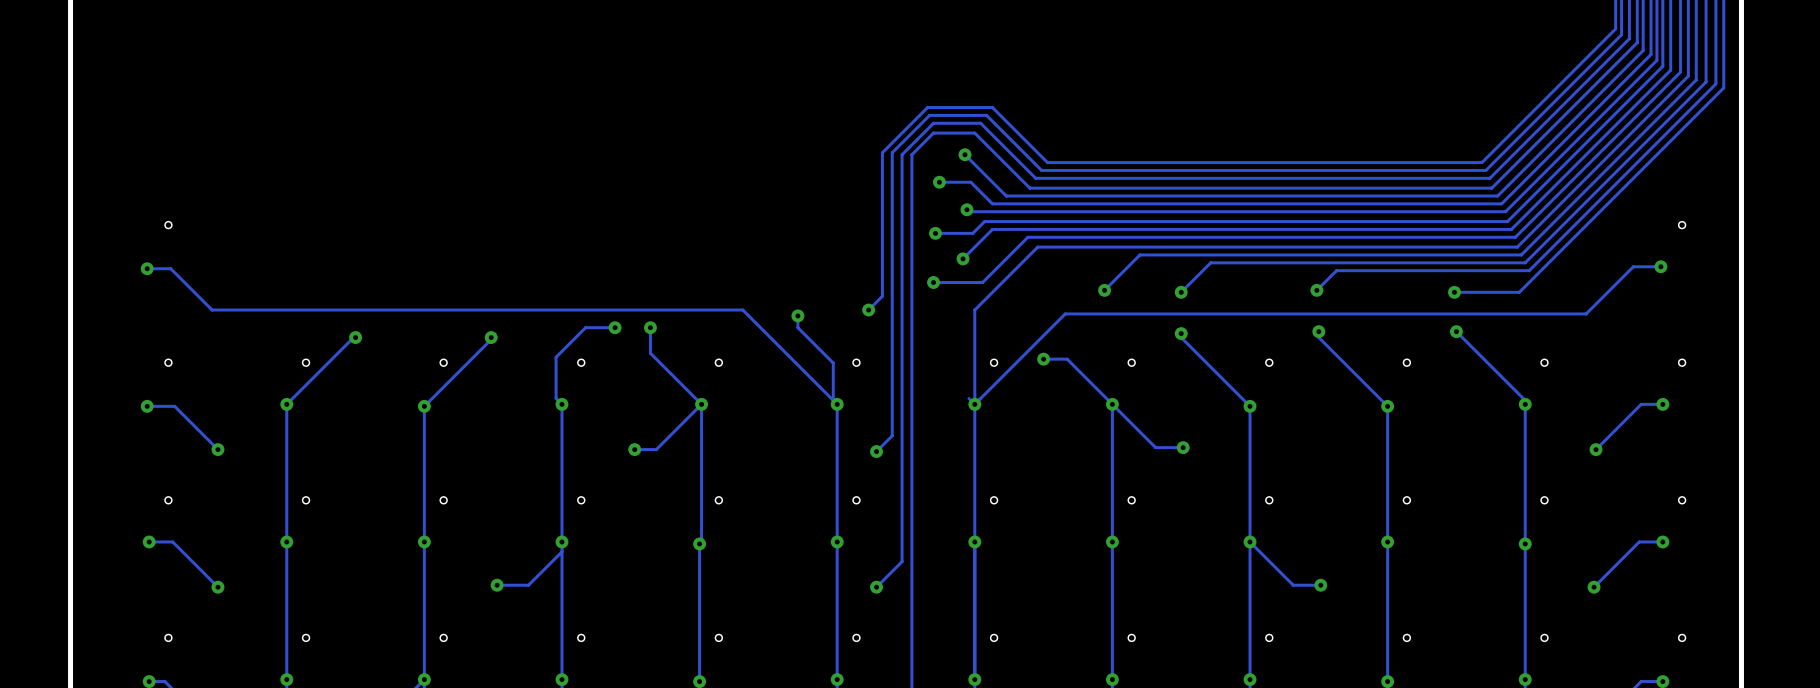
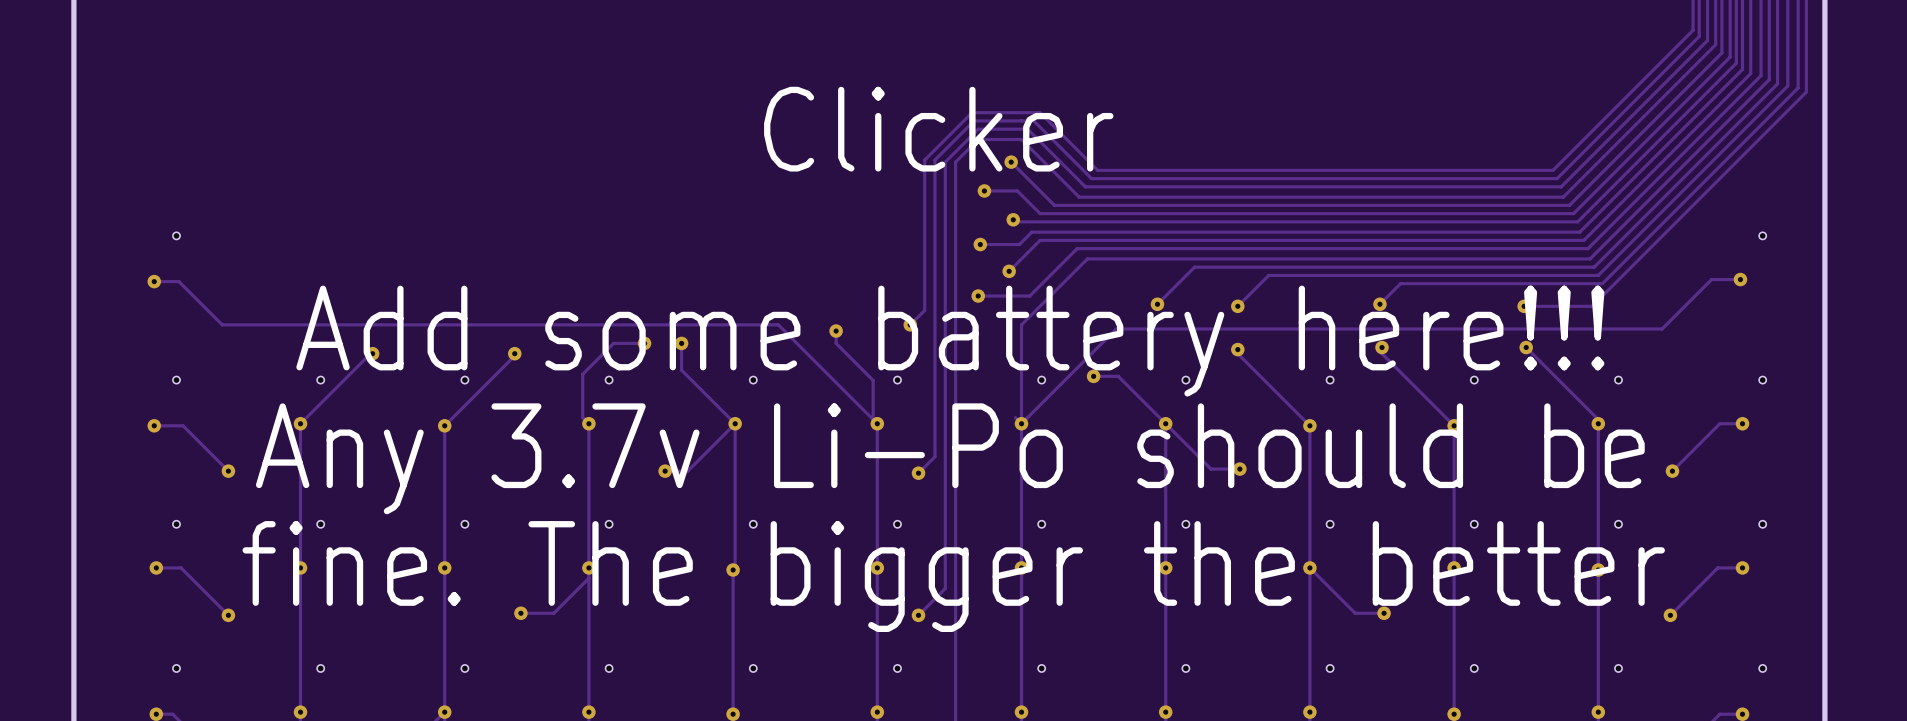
text: none -> Clicker (938, 129)
text: none -> Add some battery here!!! (950, 341)
text: none -> Any 3.7v Li-Po should be (950, 458)
text: none -> fine. The bigger the better (953, 576)

